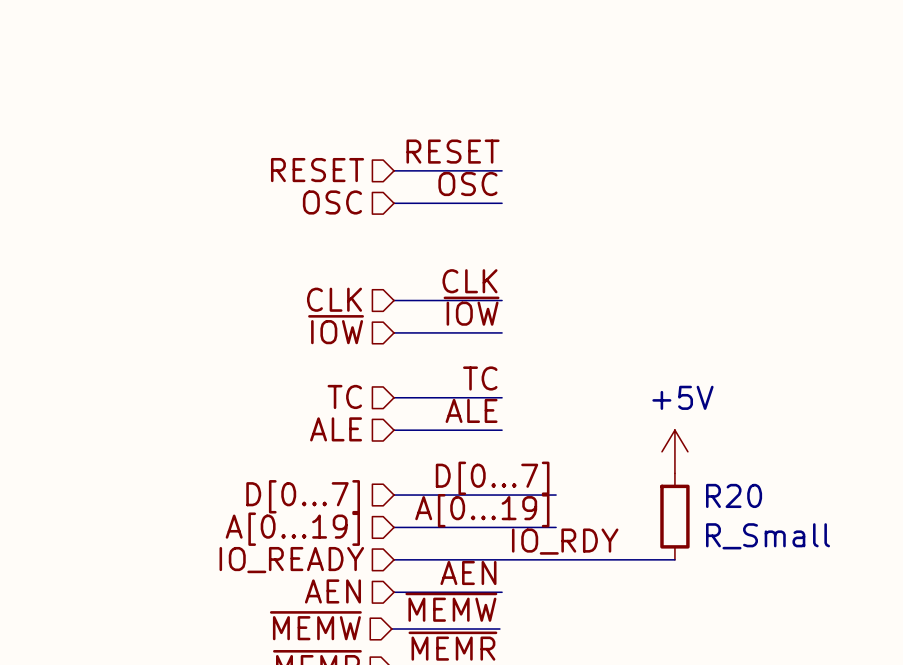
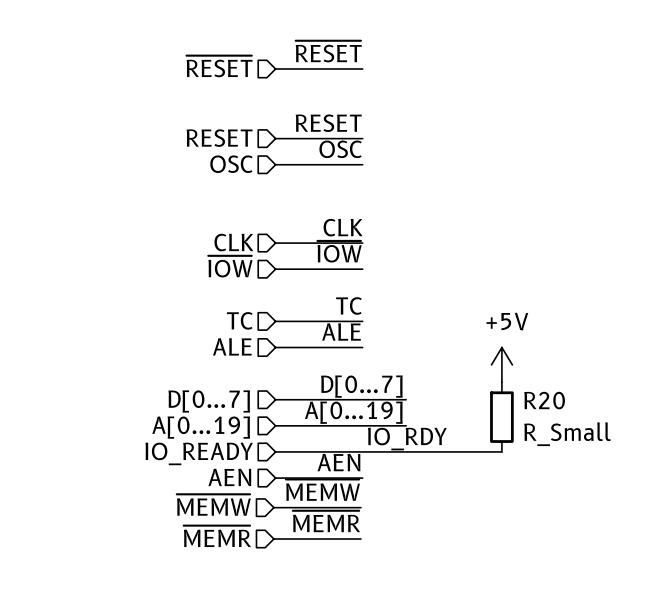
label: none -> ~{RESET} (328, 51)
hierarchical label: none -> ~{RESET} (219, 66)
wire: none -> (275, 69) (362, 69)

